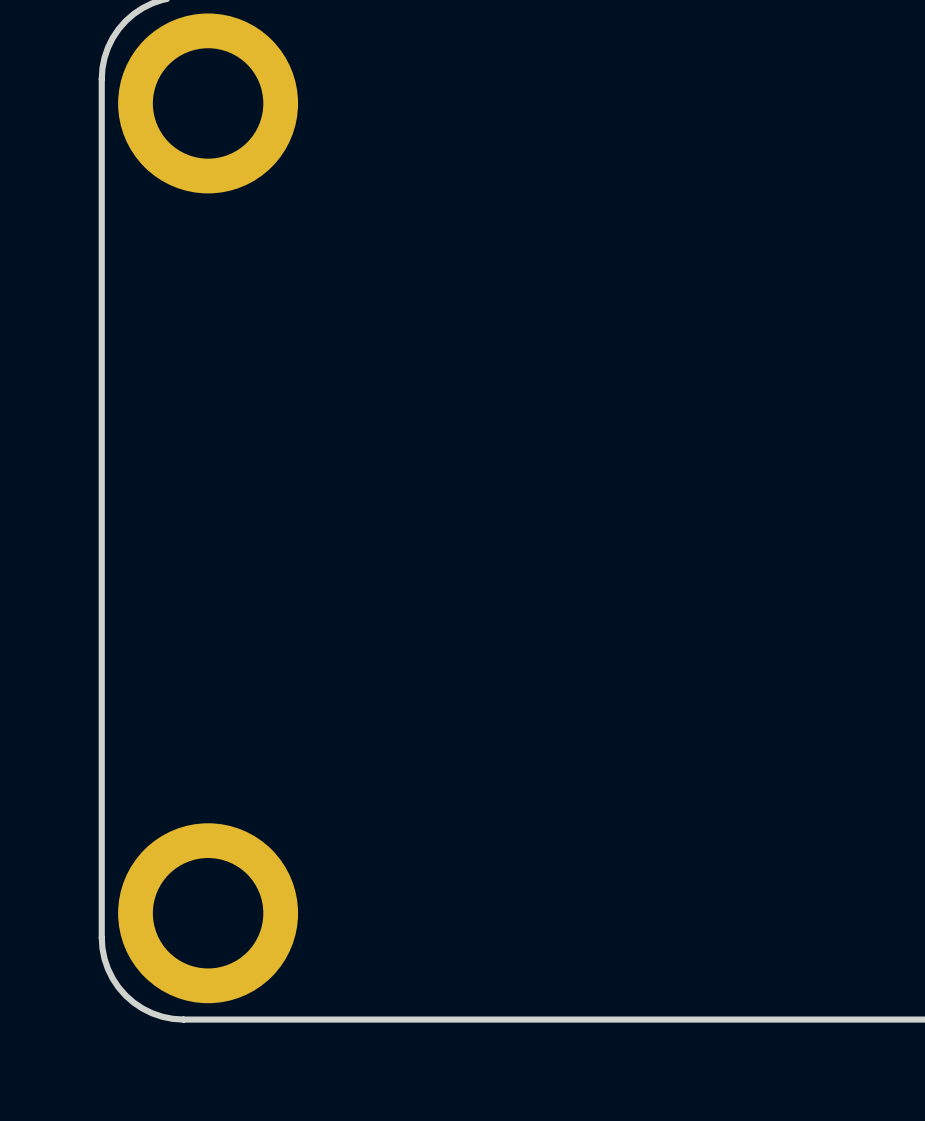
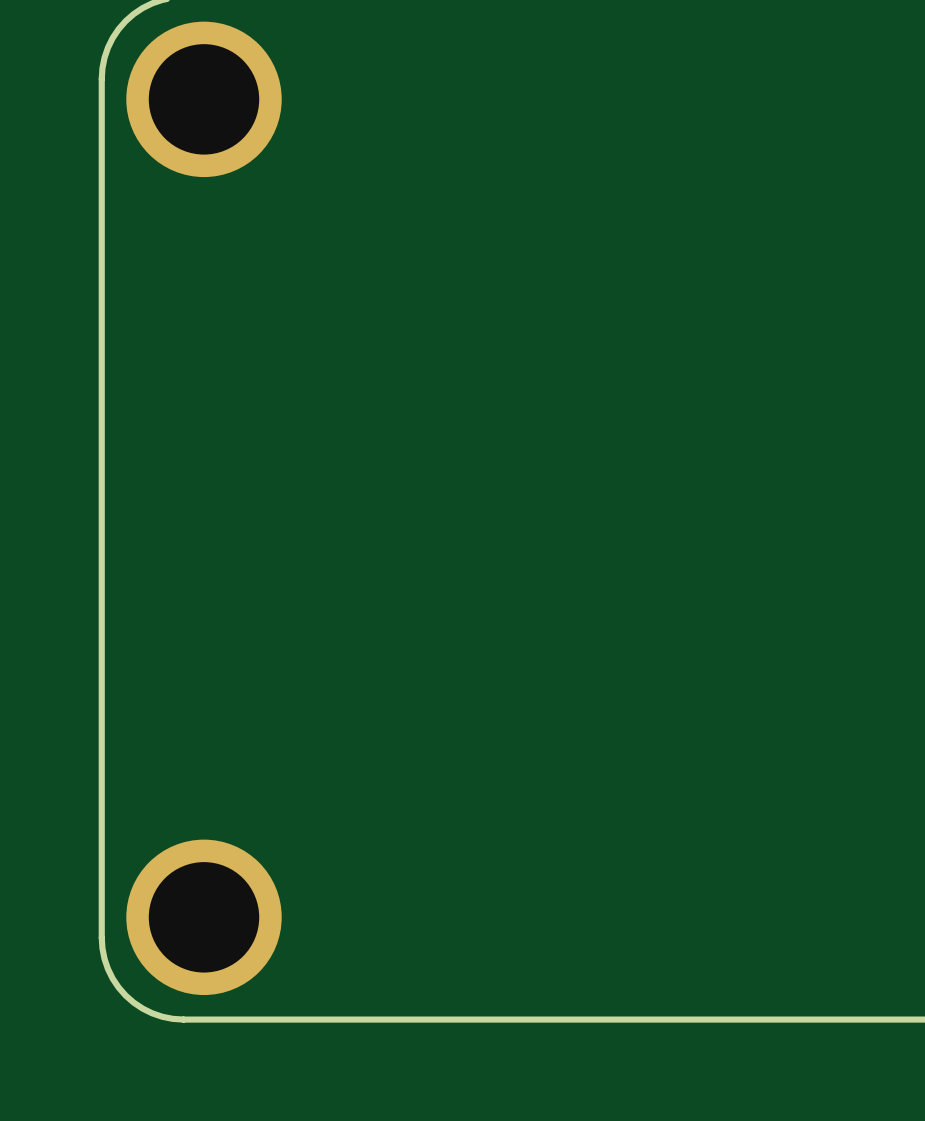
part footprint: [118, 13, 299, 194] -> [126, 21, 282, 178]
part footprint: [118, 823, 299, 1004] -> [126, 839, 282, 996]

